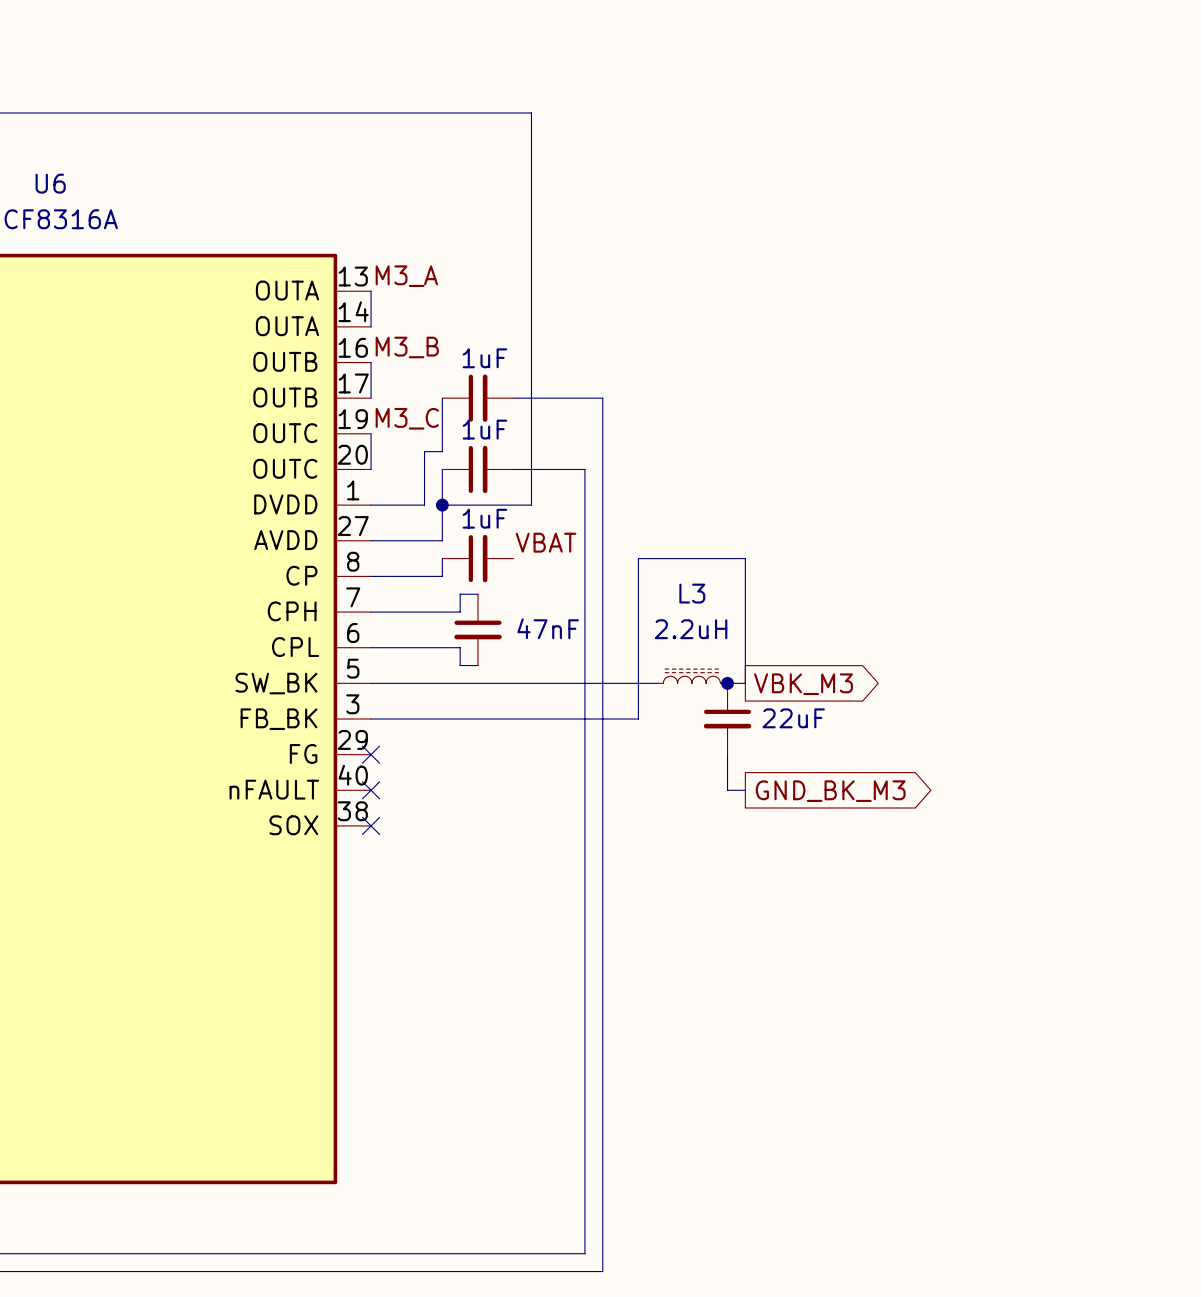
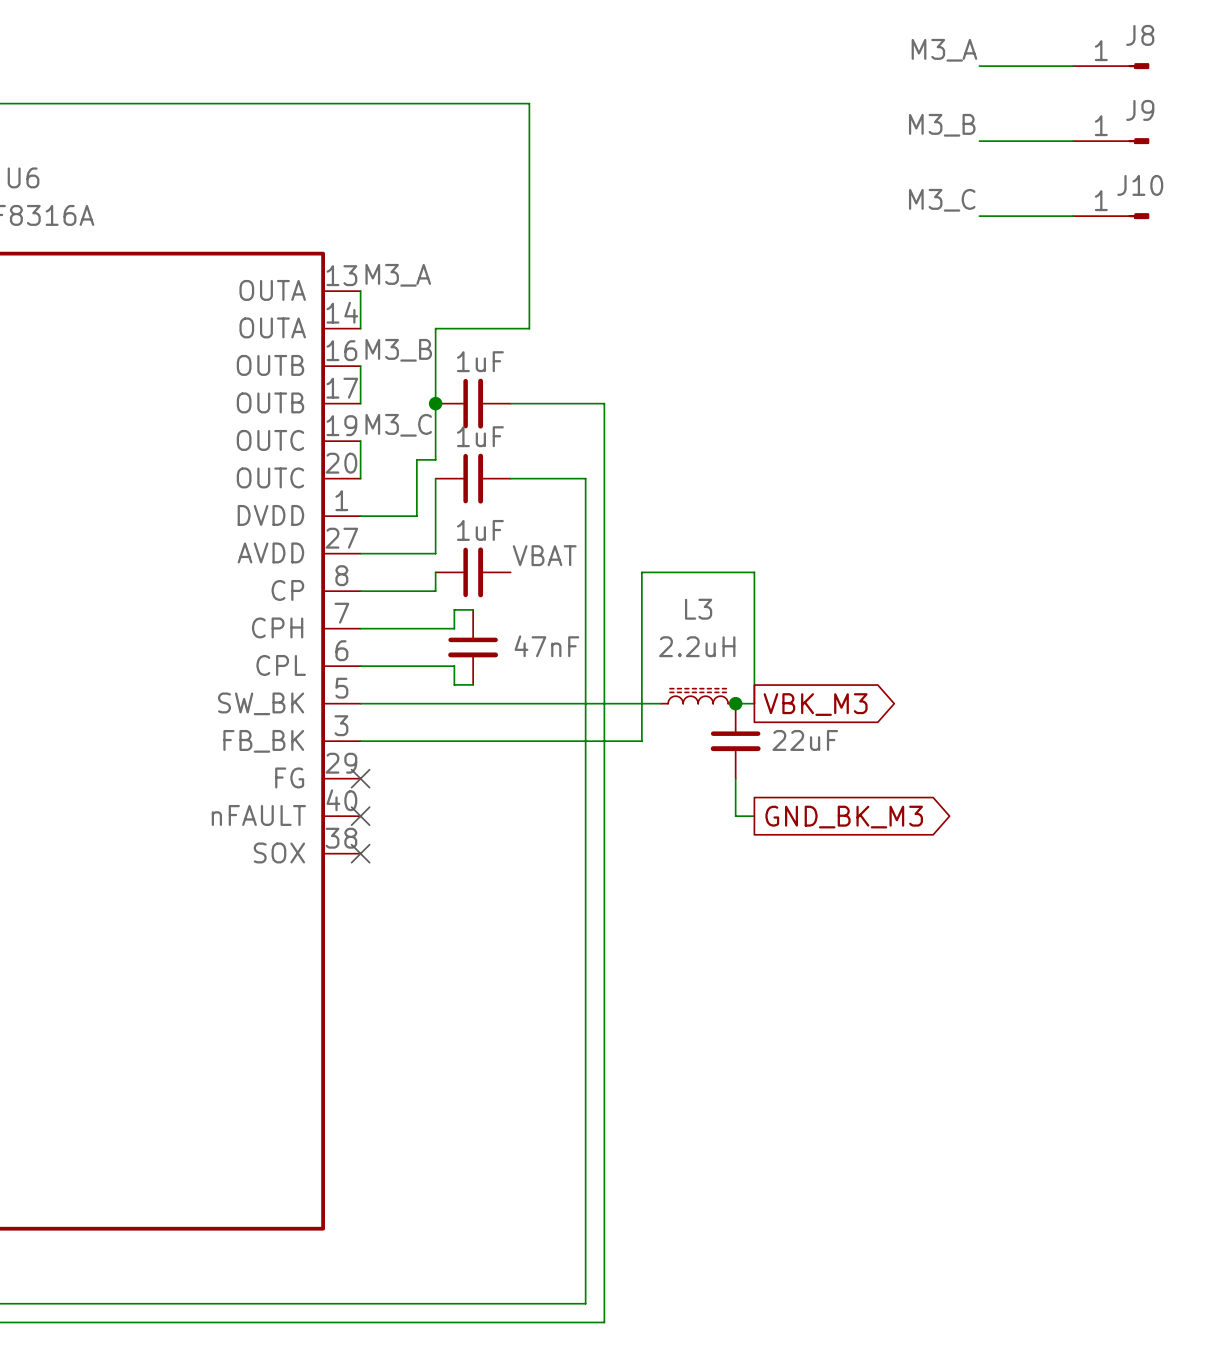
label: none -> M3_A (944, 50)
wire: none -> (979, 66) (1073, 66)
J8: none -> (1111, 66)
label: none -> M3_B (942, 125)
wire: none -> (979, 141) (1073, 141)
J9: none -> (1111, 141)
label: none -> M3_C (942, 200)
wire: none -> (979, 216) (1073, 216)
J10: none -> (1111, 216)
wire: (531, 326) (531, 505) (442, 505) -> (529, 328) (435, 328) (435, 403)
junction: none -> (435, 403)
junction: (442, 505) -> none

